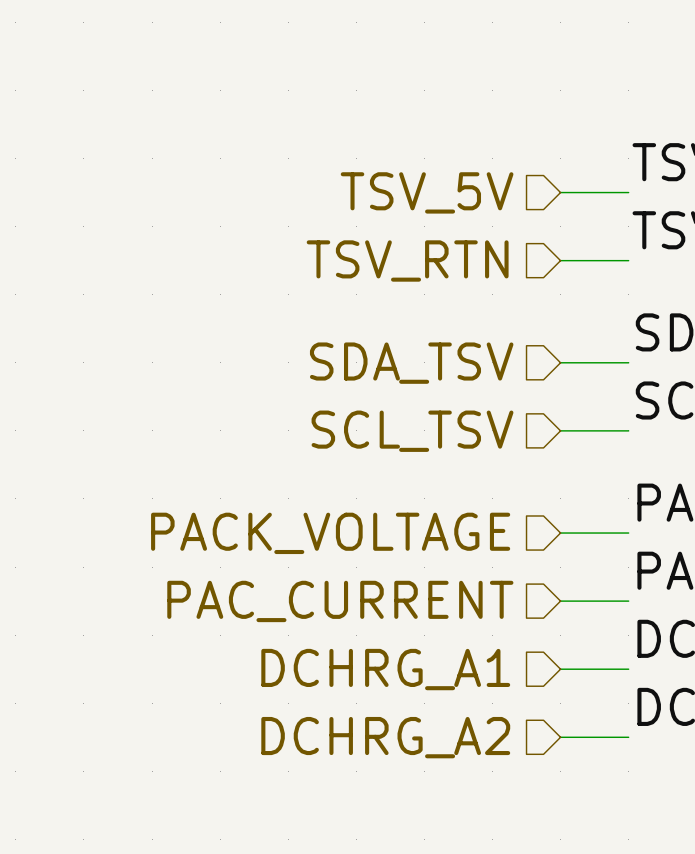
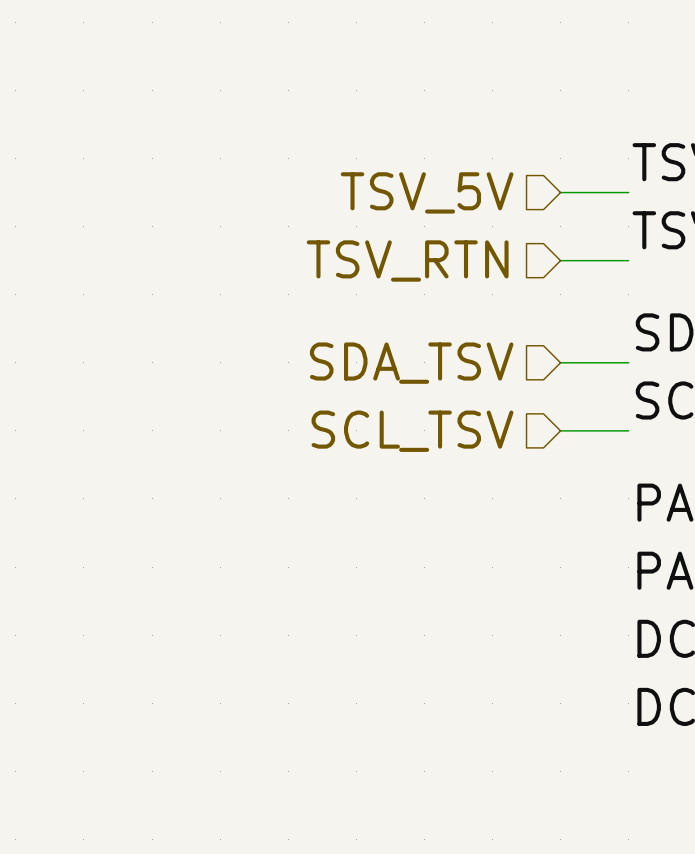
hierarchical label: PACK_VOLTAGE (330, 533) -> none
wire: (560, 533) (628, 533) -> none
hierarchical label: PAC_CURRENT (340, 601) -> none
wire: (560, 601) (628, 601) -> none
hierarchical label: DCHRG_A1 (385, 669) -> none
wire: (560, 669) (628, 669) -> none
hierarchical label: DCHRG_A2 (385, 737) -> none
wire: (560, 737) (628, 737) -> none

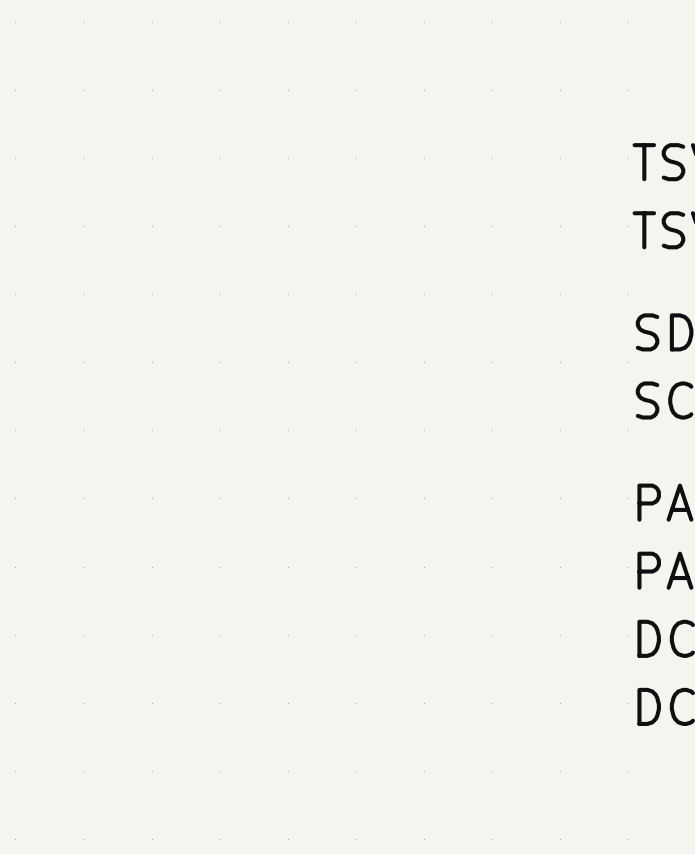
hierarchical label: TSV_5V (427, 192) -> none
wire: (560, 192) (628, 192) -> none
wire: (560, 260) (628, 260) -> none
hierarchical label: TSV_RTN (407, 261) -> none
wire: (560, 362) (628, 362) -> none
hierarchical label: SDA_TSV (411, 363) -> none
wire: (560, 430) (628, 430) -> none
hierarchical label: SCL_TSV (412, 431) -> none

